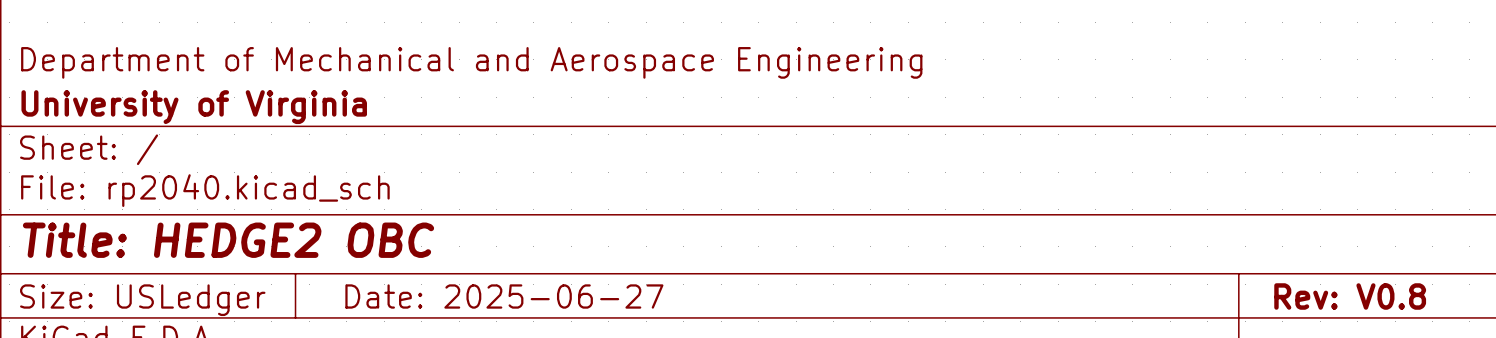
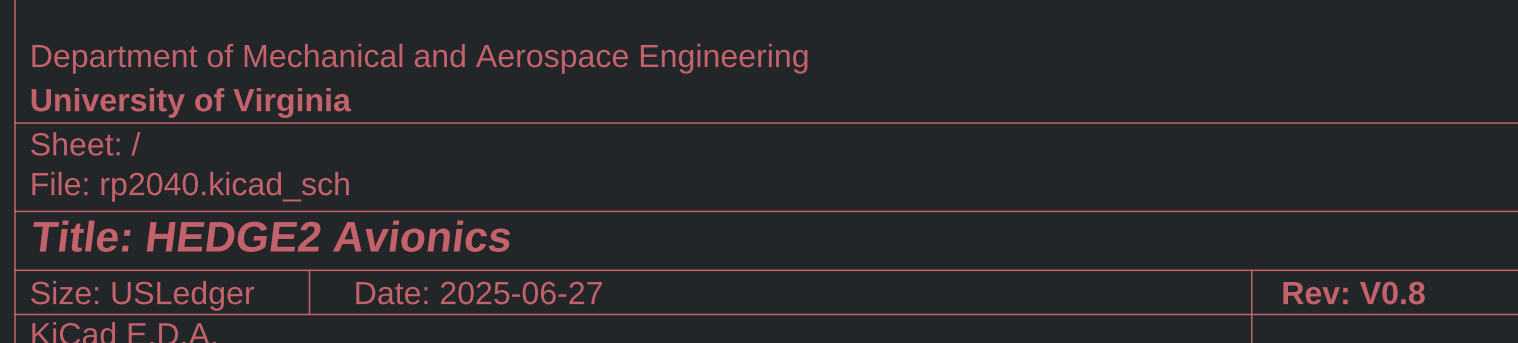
title block: Title: HEDGE2 OBC (228, 240) -> Title: HEDGE2 Avionics (271, 236)

